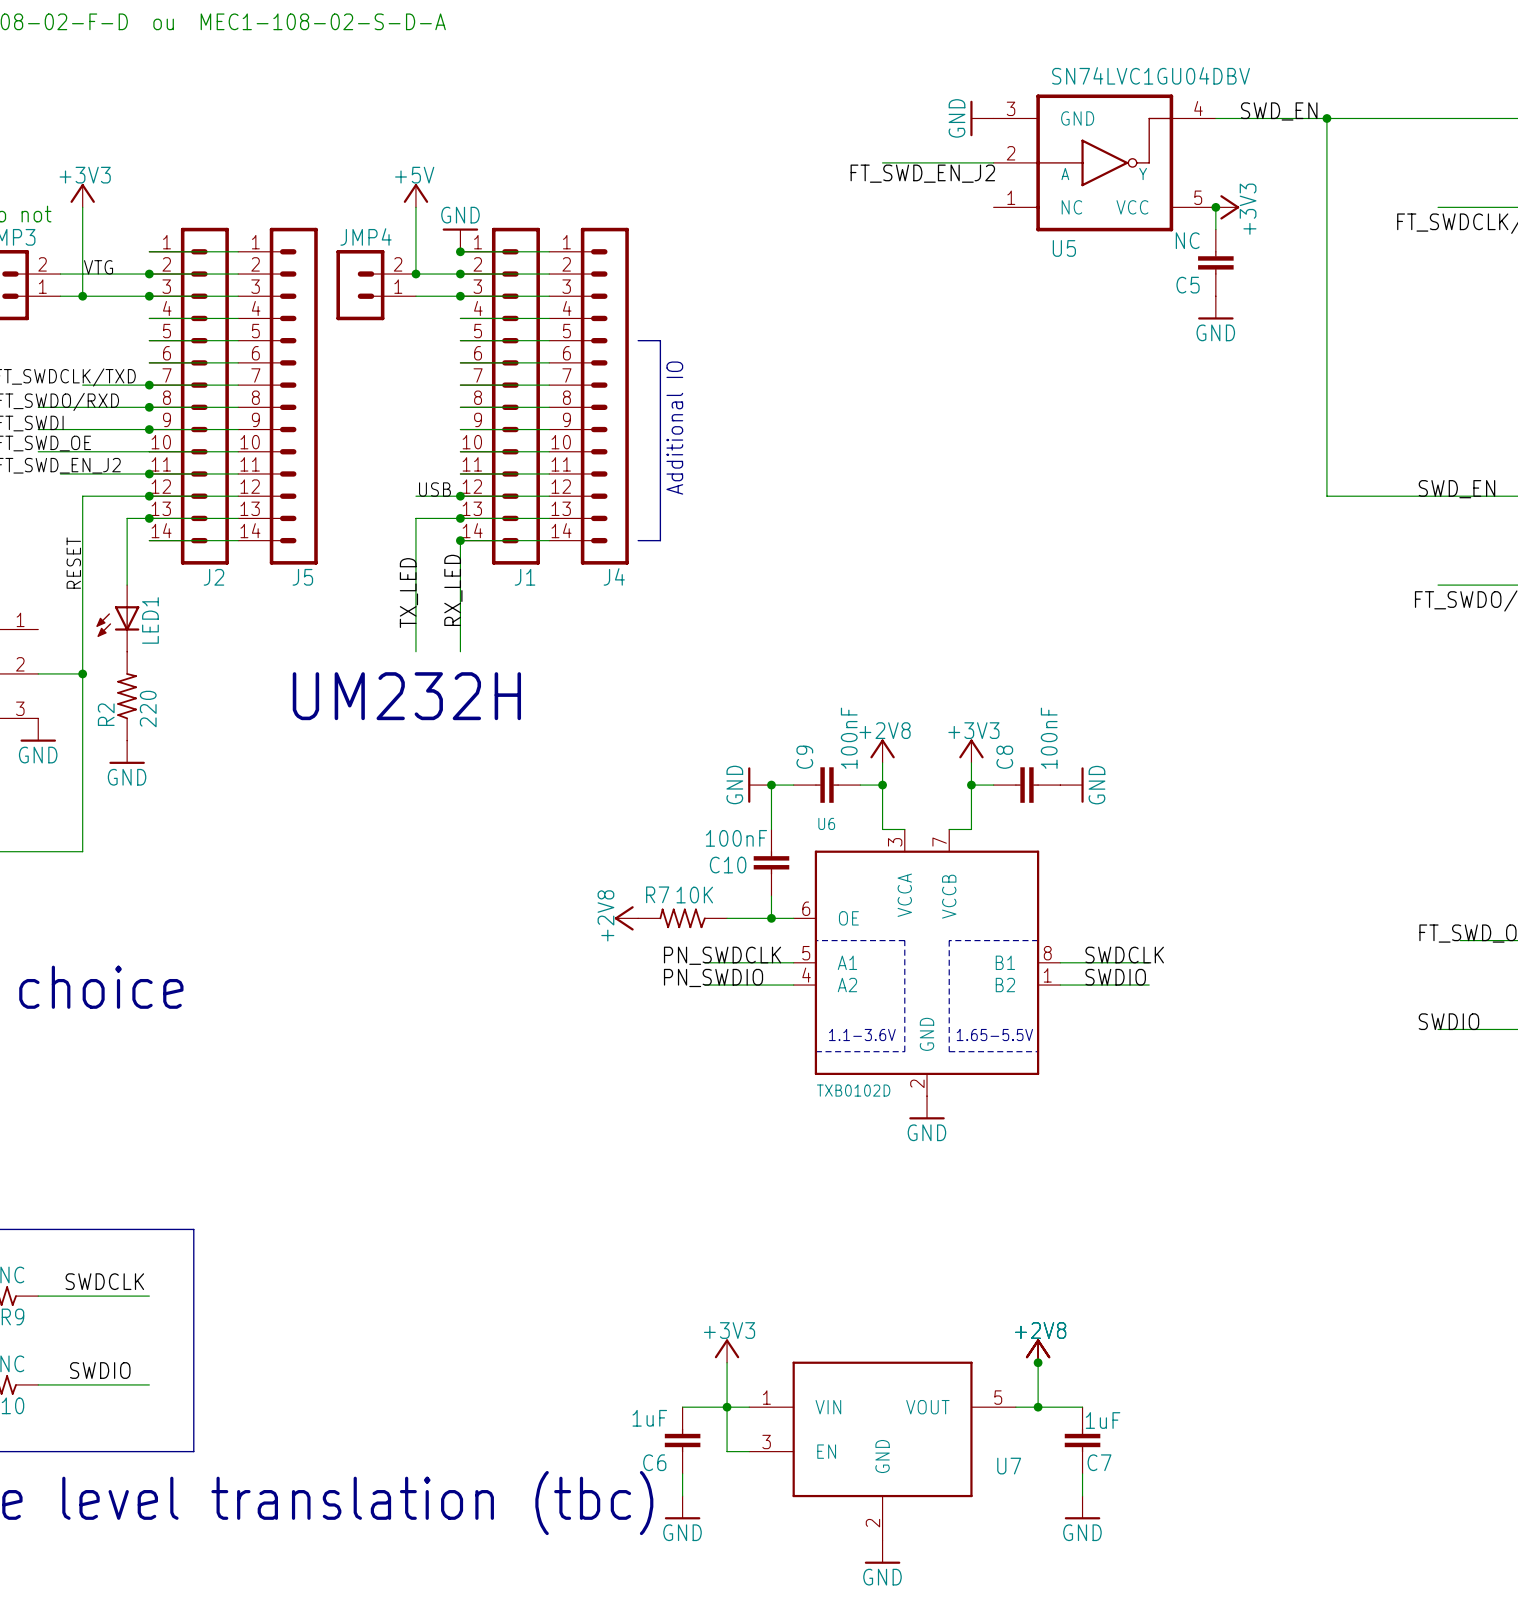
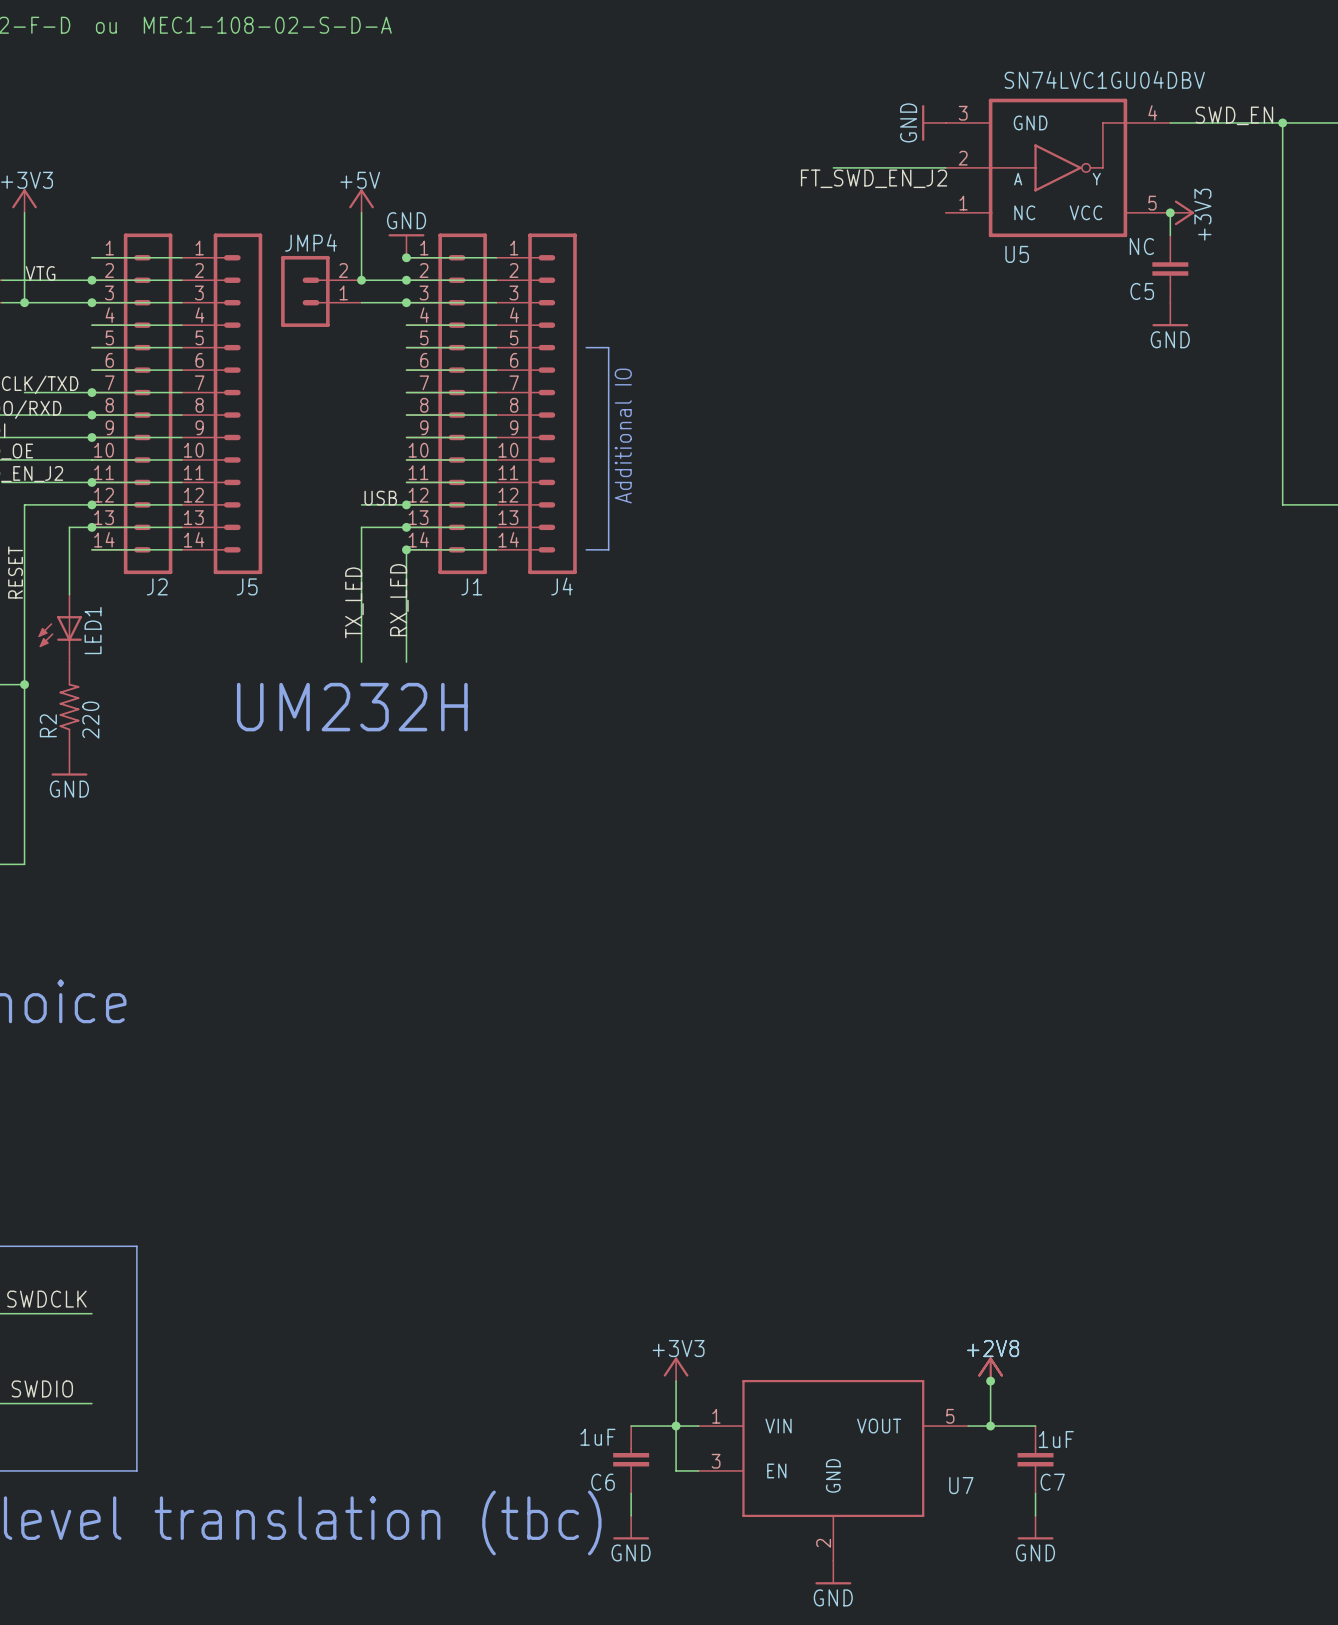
power symbol: +2V8 (882, 751) -> none
power symbol: +3V3 (971, 751) -> none
wire: (882, 762) (882, 829) (904, 829) -> none
wire: (971, 762) (971, 829) (949, 829) -> none
power symbol: GND (759, 785) -> none
junction: (771, 785) -> none
wire: (793, 785) (771, 785) (771, 829) -> none
C9: 100nF (827, 785) -> none
wire: (860, 785) (882, 785) -> none
junction: (882, 785) -> none
wire: (971, 785) (993, 785) -> none
junction: (971, 785) -> none
C8: 100nF (1026, 785) -> none
power symbol: GND (1071, 785) -> none
C10: 100nF (771, 862) -> none
wire: (771, 896) (771, 918) -> none
power symbol: +2V8 (626, 918) -> none
R7: 10K (682, 918) -> none
wire: (727, 918) (793, 918) -> none
junction: (771, 918) -> none
label: PN_SWDCLK (722, 955) -> none
label: SWDCLK (1124, 955) -> none
wire: (704, 962) (793, 962) -> none
U6: TXB0102D (927, 962) -> none
wire: (1060, 962) (1149, 962) -> none
label: PN_SWDIO (713, 977) -> none
label: SWDIO (1115, 977) -> none
wire: (704, 985) (793, 985) -> none
wire: (1060, 985) (1149, 985) -> none
power symbol: GND (927, 1107) -> none

